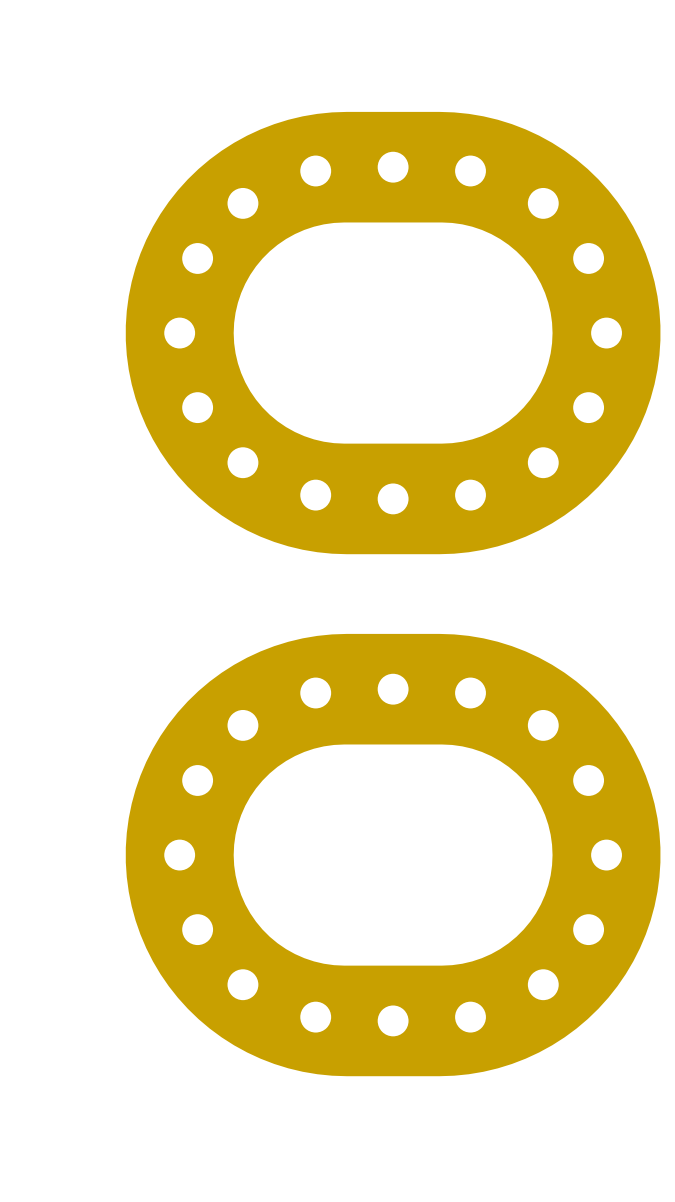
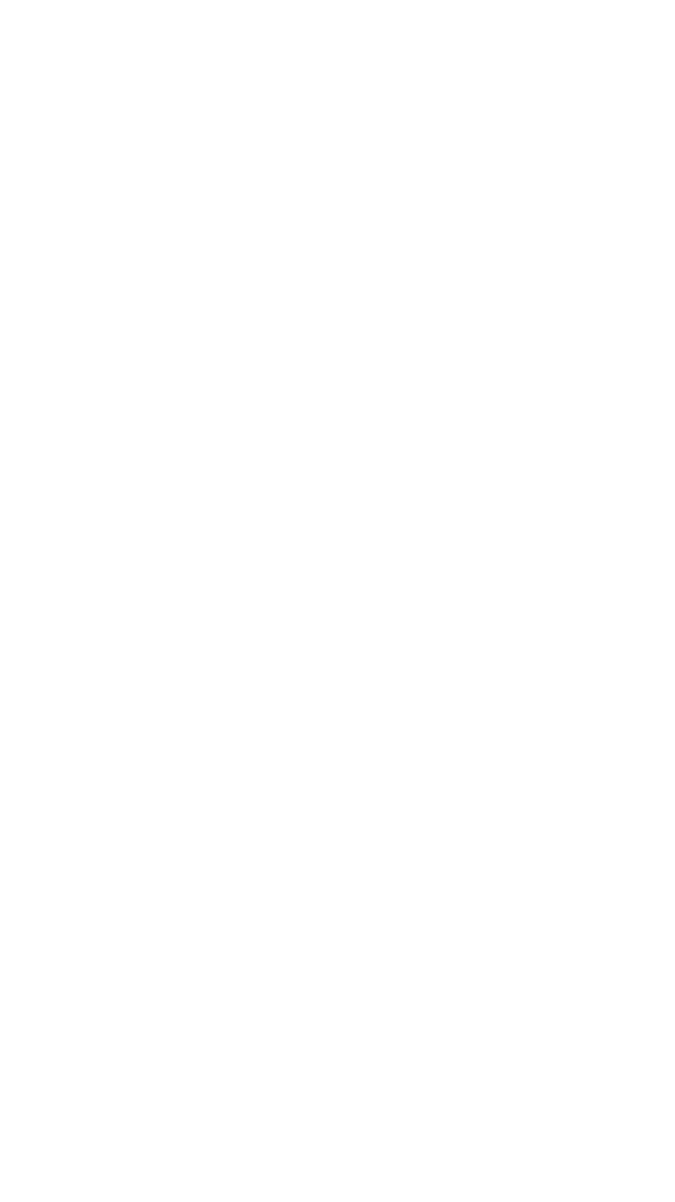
part: (393, 333) -> none
part: (393, 855) -> none

